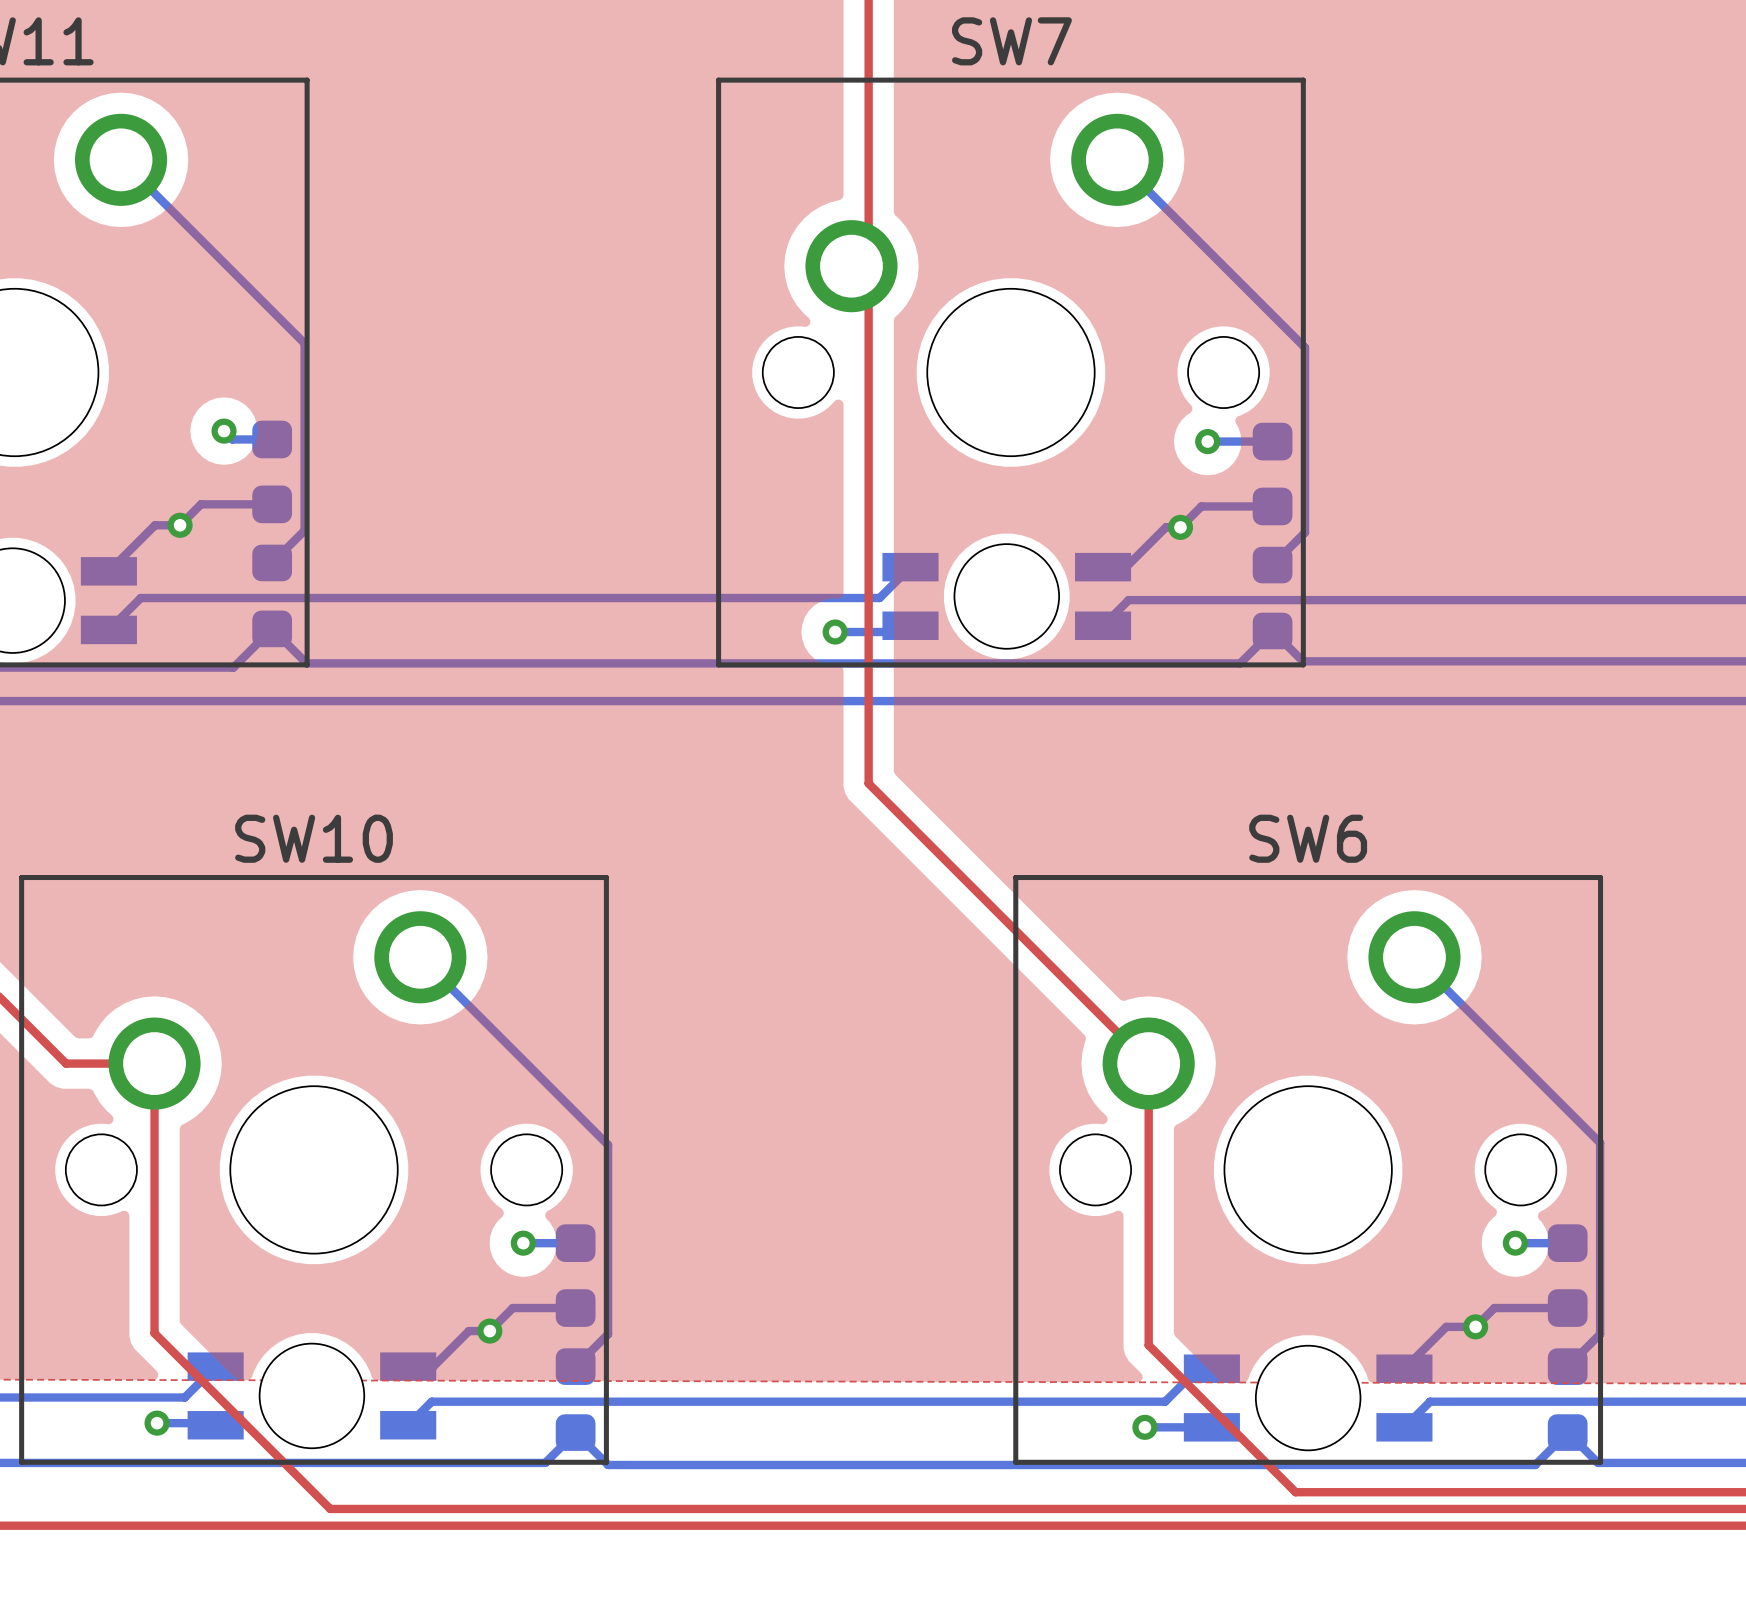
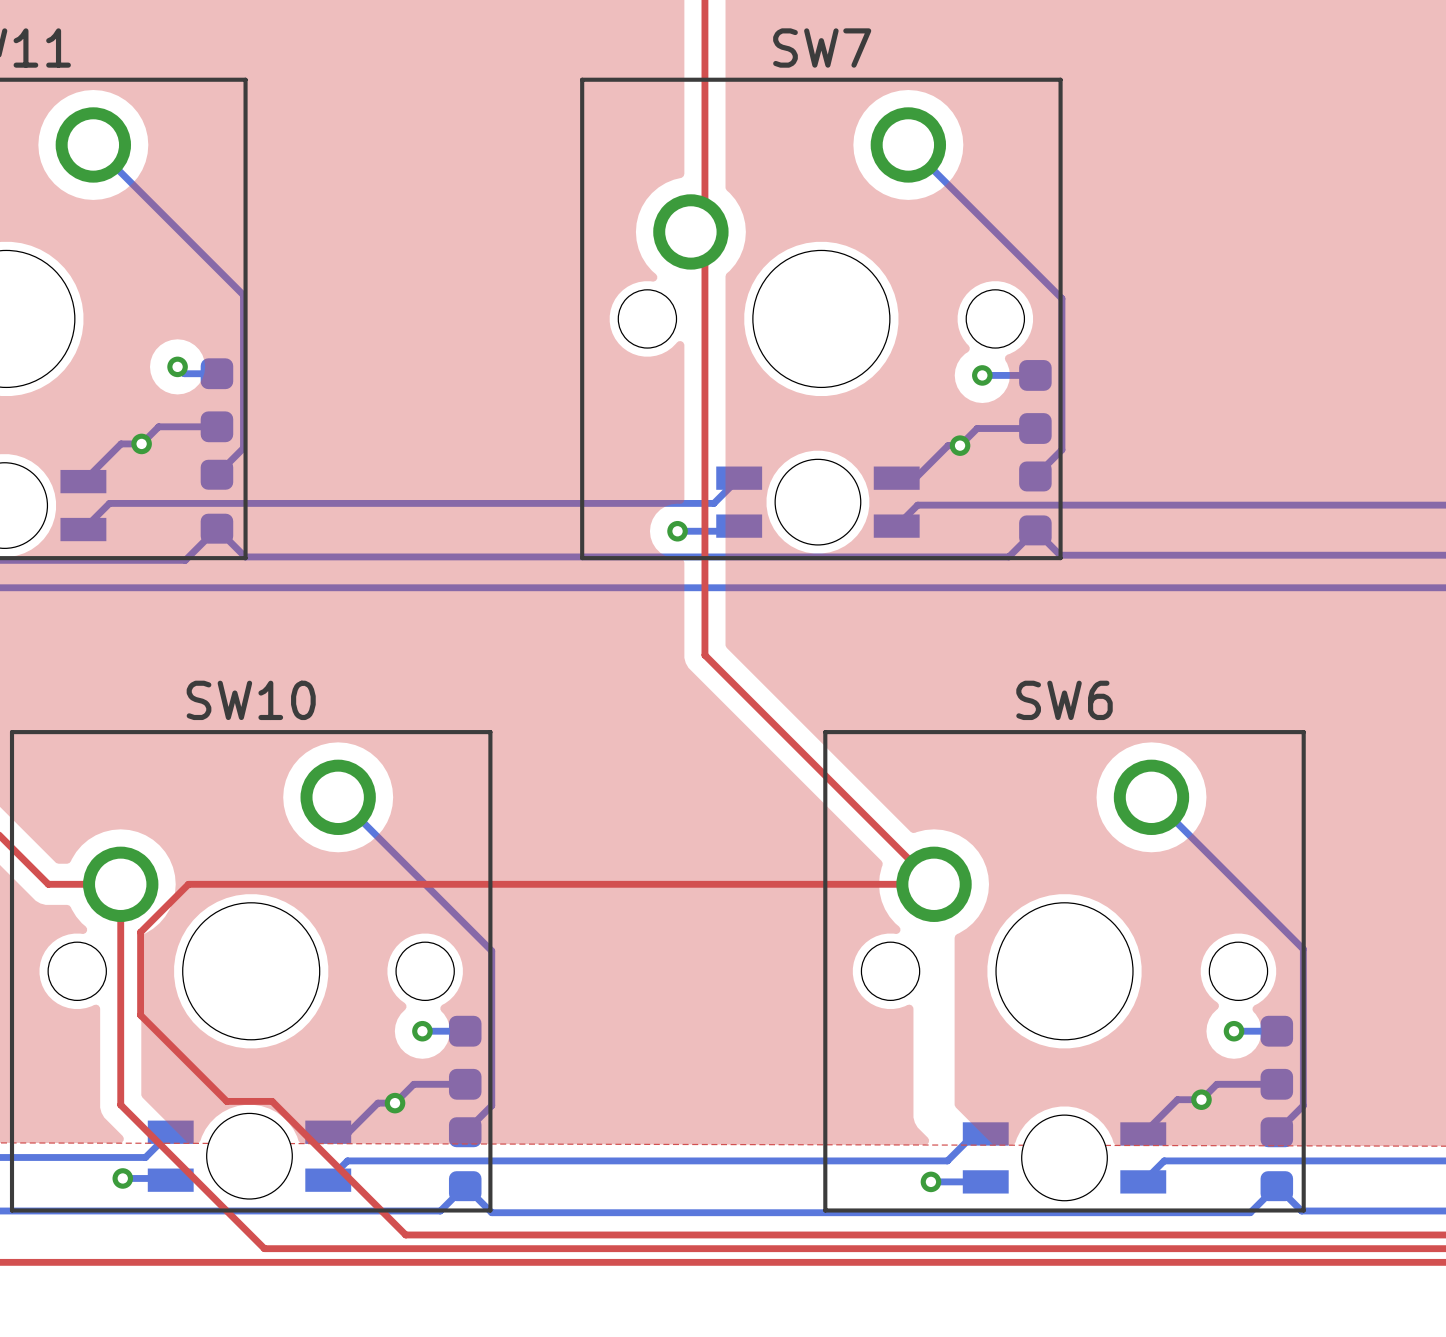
top track: (1148, 1063) (1148, 1345) (1295, 1492) -> (934, 884) (188, 884) (140, 932) (140, 1015) (226, 1101) (272, 1101) (405, 1234) (1054, 1234)

